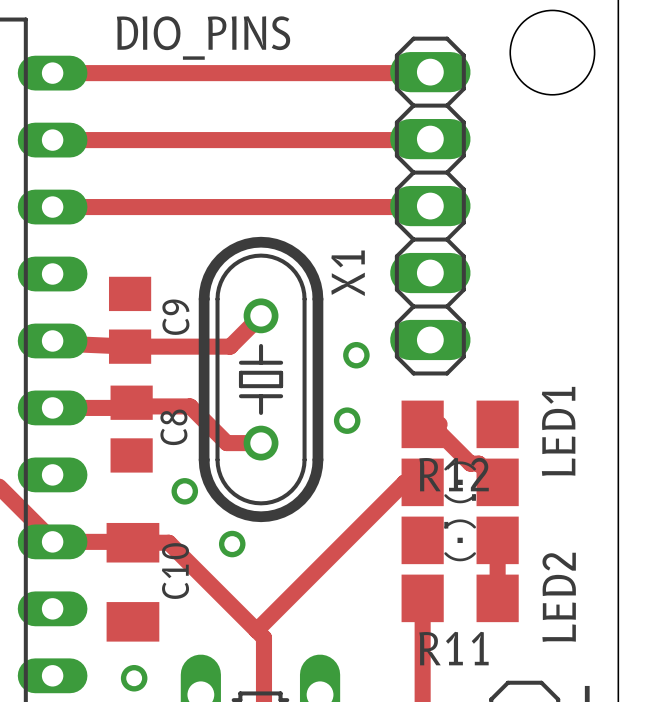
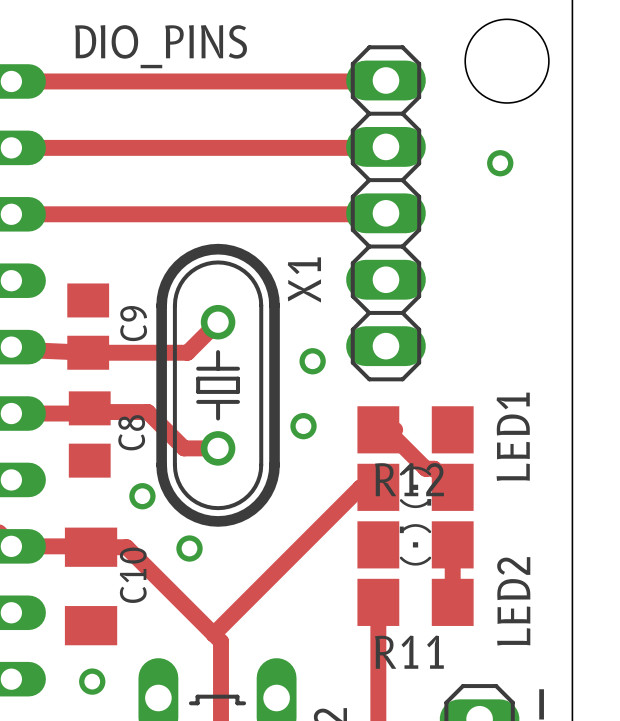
via: none -> (500, 163)

